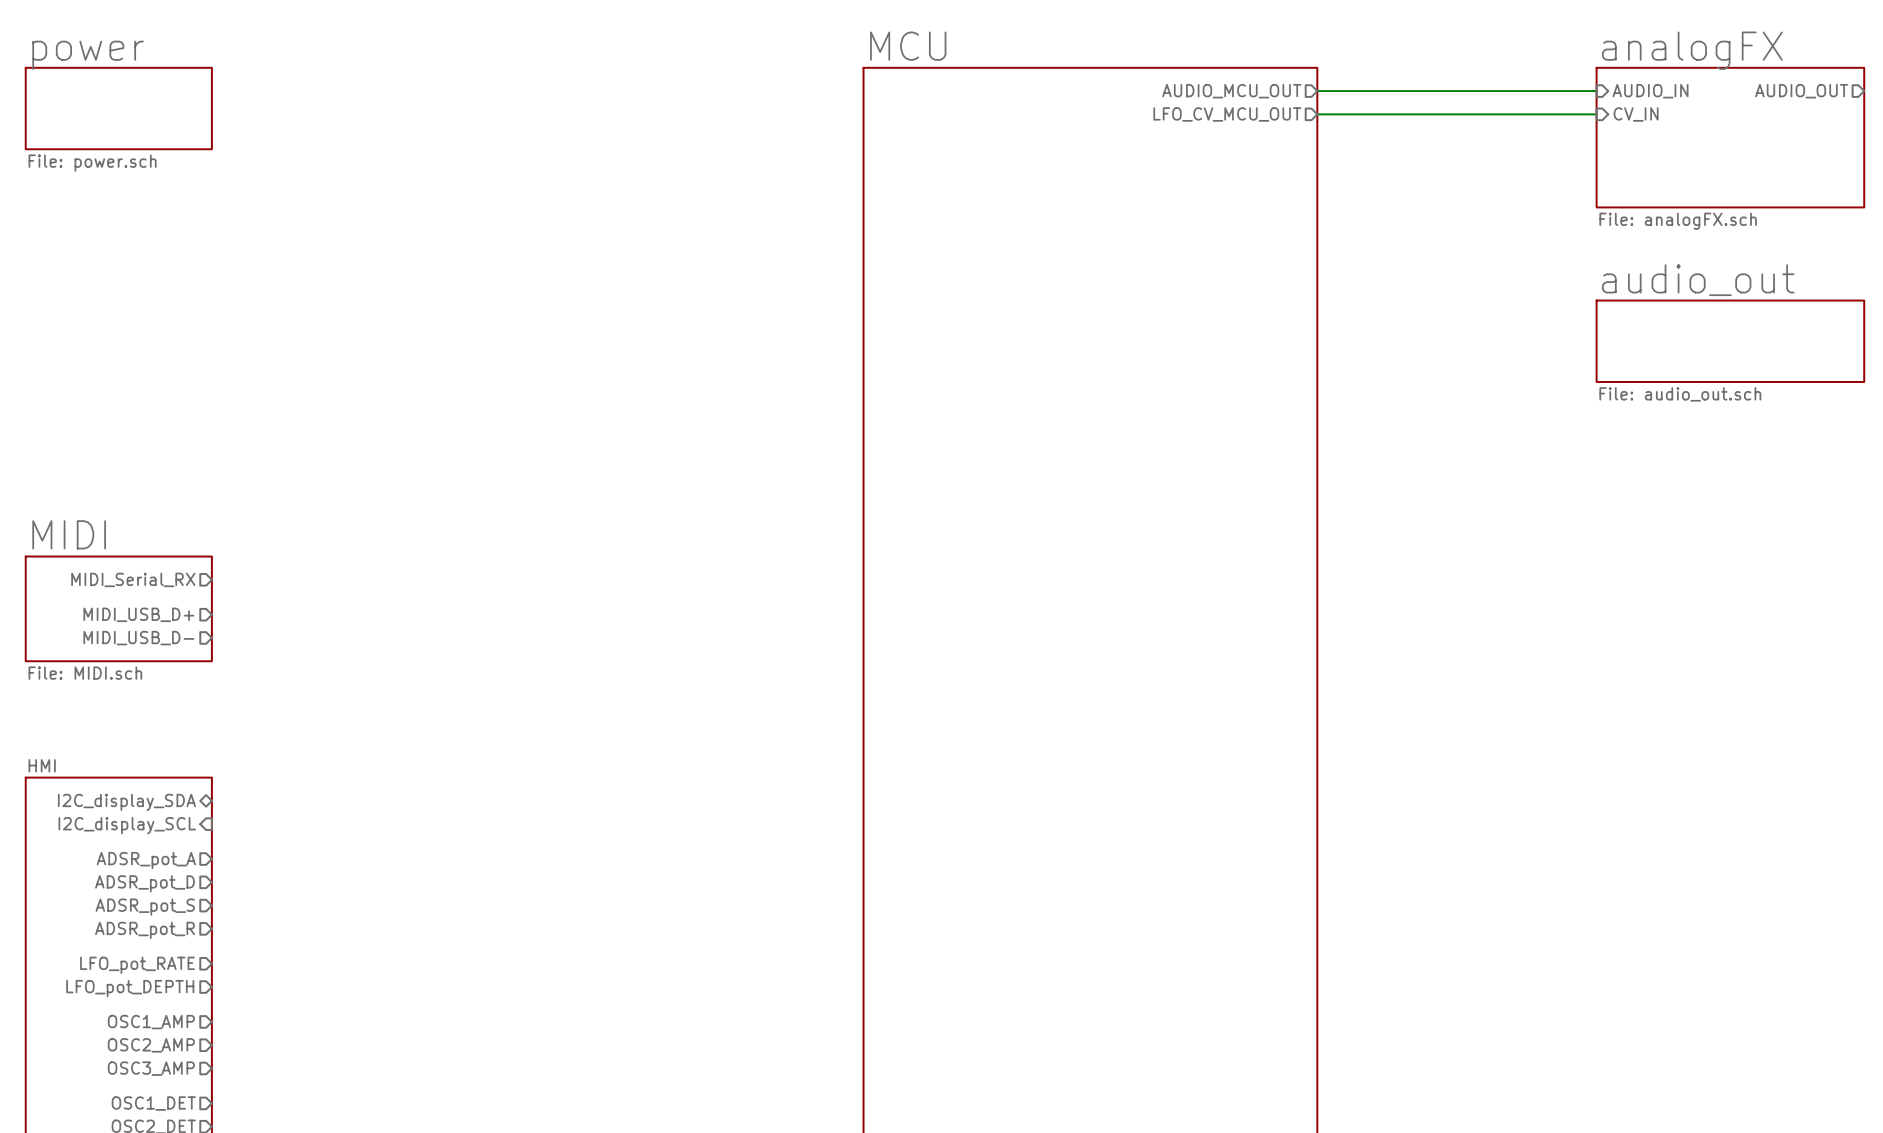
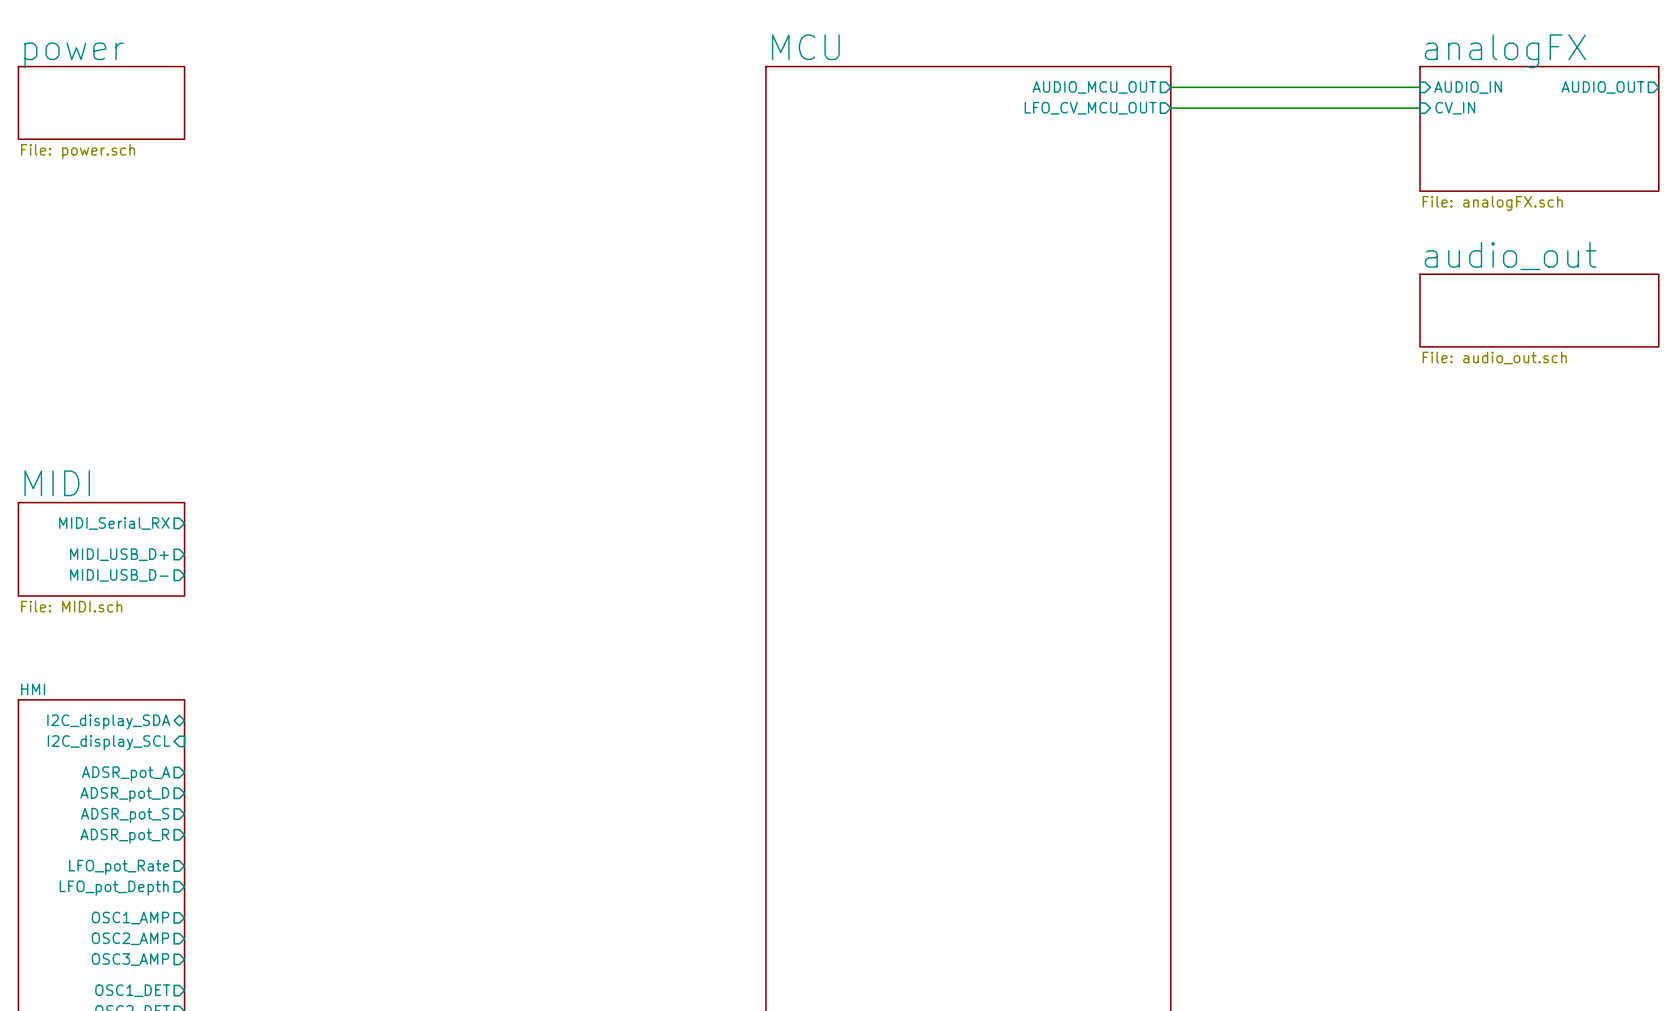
sheet pin: LFO_pot_RATE (137, 965) -> LFO_pot_Rate (119, 867)
sheet pin: LFO_pot_DEPTH (130, 988) -> LFO_pot_Depth (114, 888)

